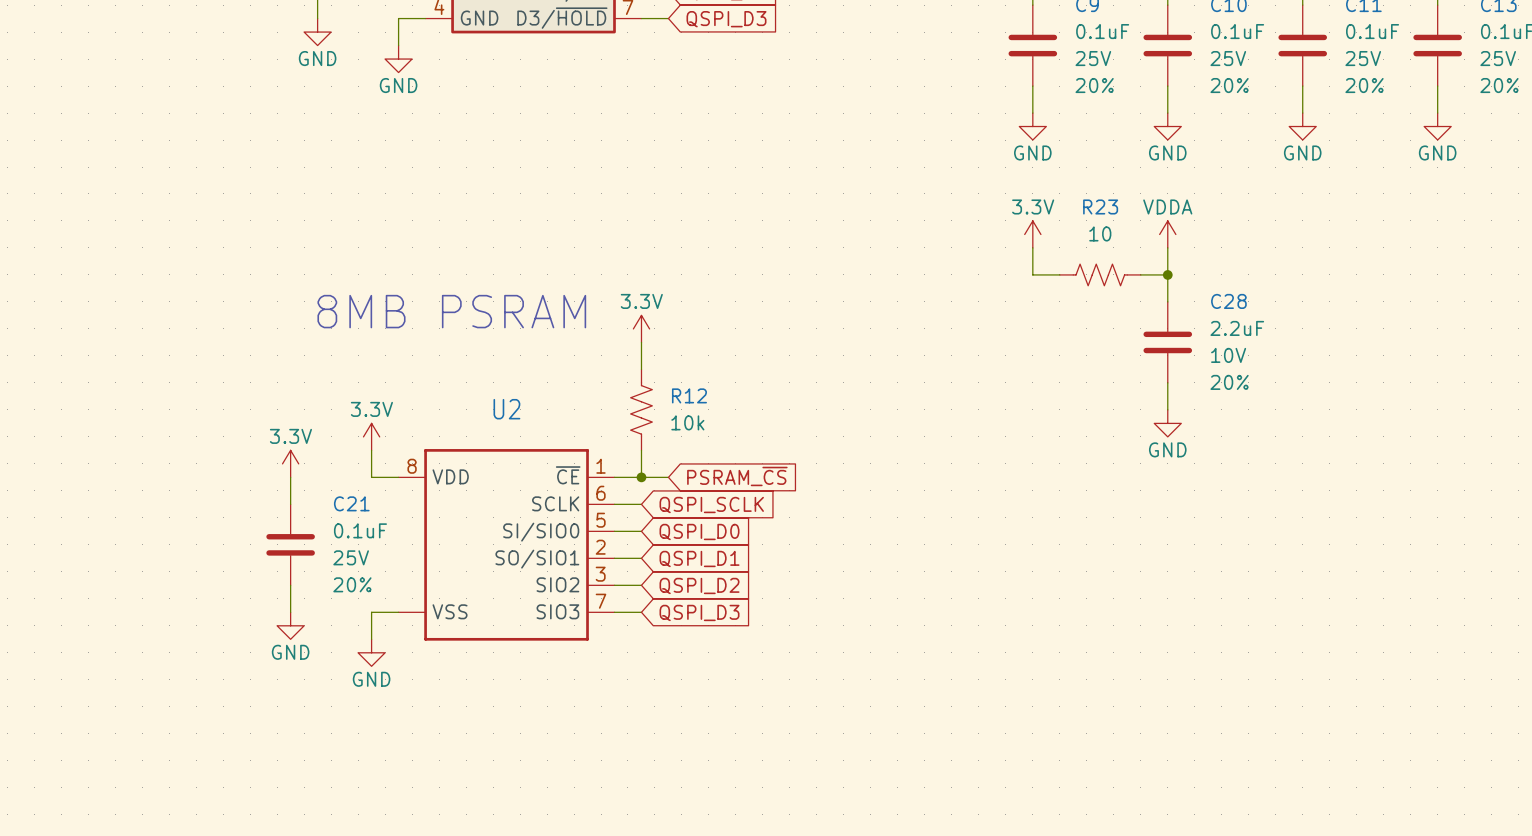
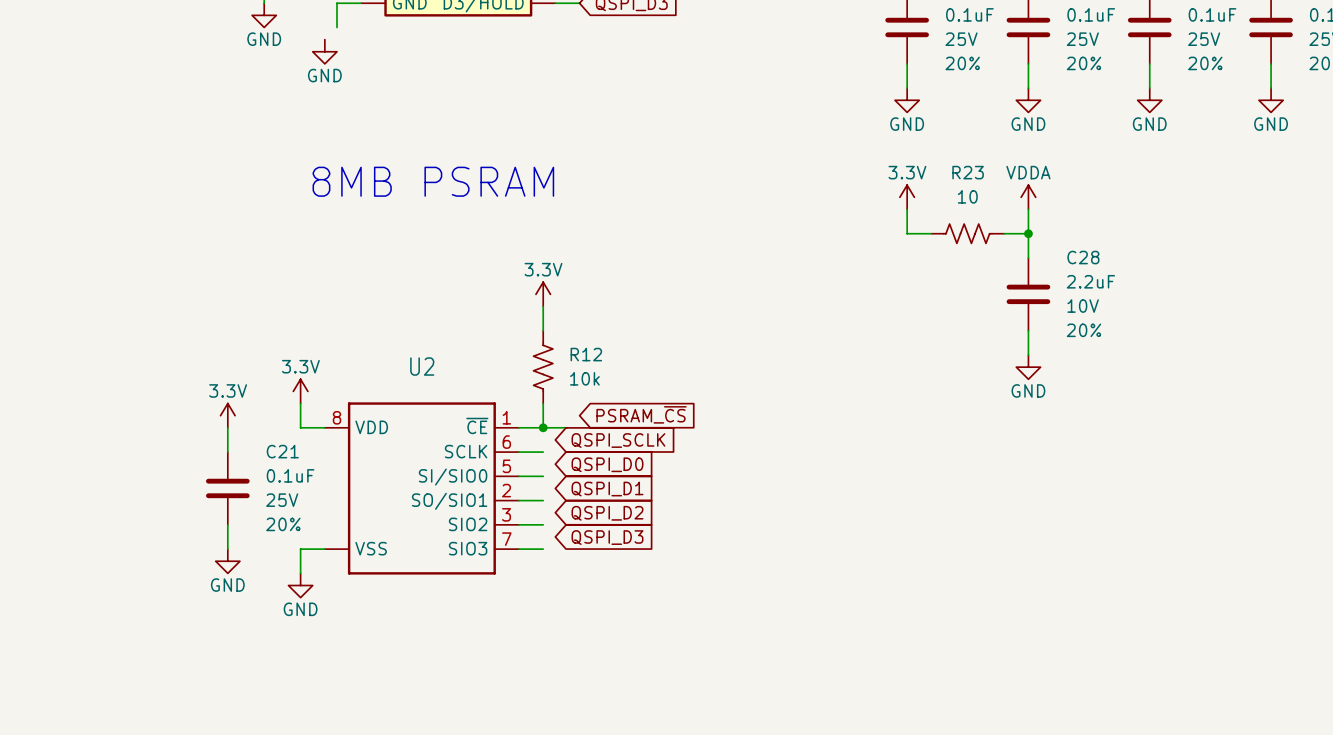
power symbol position: GND (398, 59) -> GND (324, 51)
text position: 8MB PSRAM (451, 311) -> 8MB PSRAM (433, 181)
power symbol position: 3.3V (641, 328) -> 3.3V (543, 294)
wire: (641, 342) (641, 369) -> (543, 306) (543, 330)
R12 position: (641, 409) -> (543, 367)
power symbol position: 3.3V (371, 436) -> 3.3V (300, 391)
wire: (371, 450) (371, 477) (398, 477) -> (300, 403) (300, 427) (324, 427)
wire: (641, 450) (641, 477) -> (543, 403) (543, 427)
power symbol position: 3.3V (290, 463) -> 3.3V (227, 415)
wire: (290, 477) (290, 504) -> (227, 427) (227, 452)
wire: (614, 477) (668, 477) -> (518, 427) (567, 427)
junction position: (641, 477) -> (543, 427)
wire: (614, 504) (641, 504) -> (518, 452) (543, 452)
wire: (614, 531) (641, 531) -> (518, 476) (543, 476)
C21 position: (290, 544) -> (227, 488)
U2 position: (506, 544) -> (421, 488)
wire: (614, 558) (641, 558) -> (518, 500) (543, 500)
wire: (290, 585) (290, 612) -> (227, 524) (227, 549)
wire: (614, 585) (641, 585) -> (518, 524) (543, 524)
wire: (398, 612) (371, 612) (371, 639) -> (324, 549) (300, 549) (300, 573)
wire: (614, 612) (641, 612) -> (518, 549) (543, 549)
power symbol position: GND (290, 625) -> GND (227, 561)
power symbol position: GND (371, 652) -> GND (300, 585)

